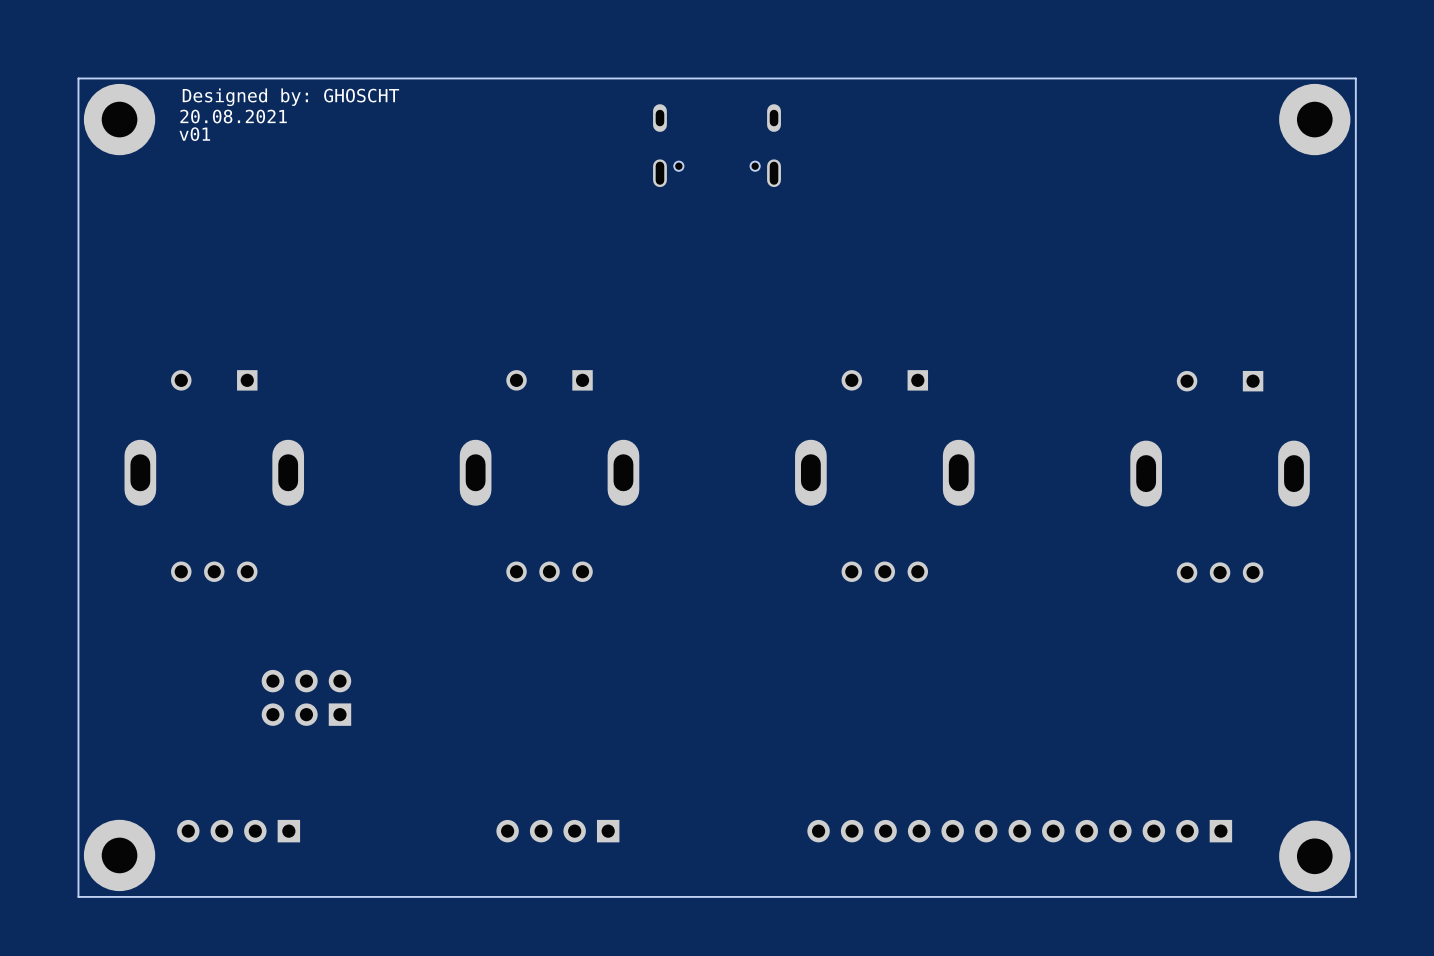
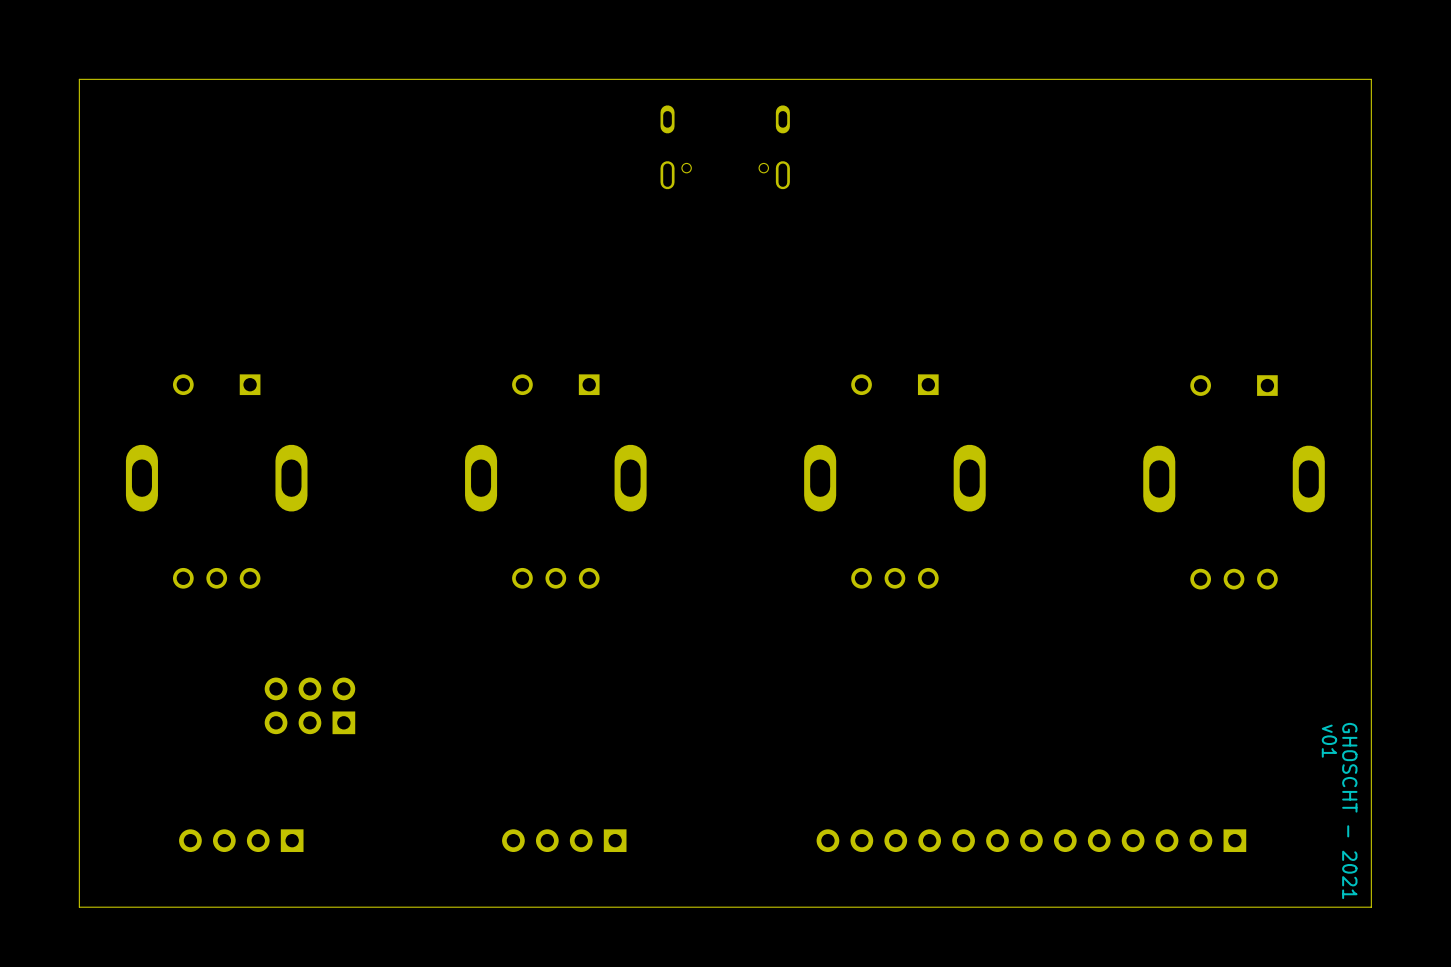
text: Designed by: GHOSCHT (290, 97) -> none
text: 20.08.2021 (233, 116) -> none
part: (119, 119) -> none
part: (1314, 119) -> none
text: v01 (194, 134) -> none
text: none -> v01 (1329, 741)
text: none -> GHOSCHT - 2021 (1349, 810)
part: (119, 855) -> none
part: (1314, 856) -> none

